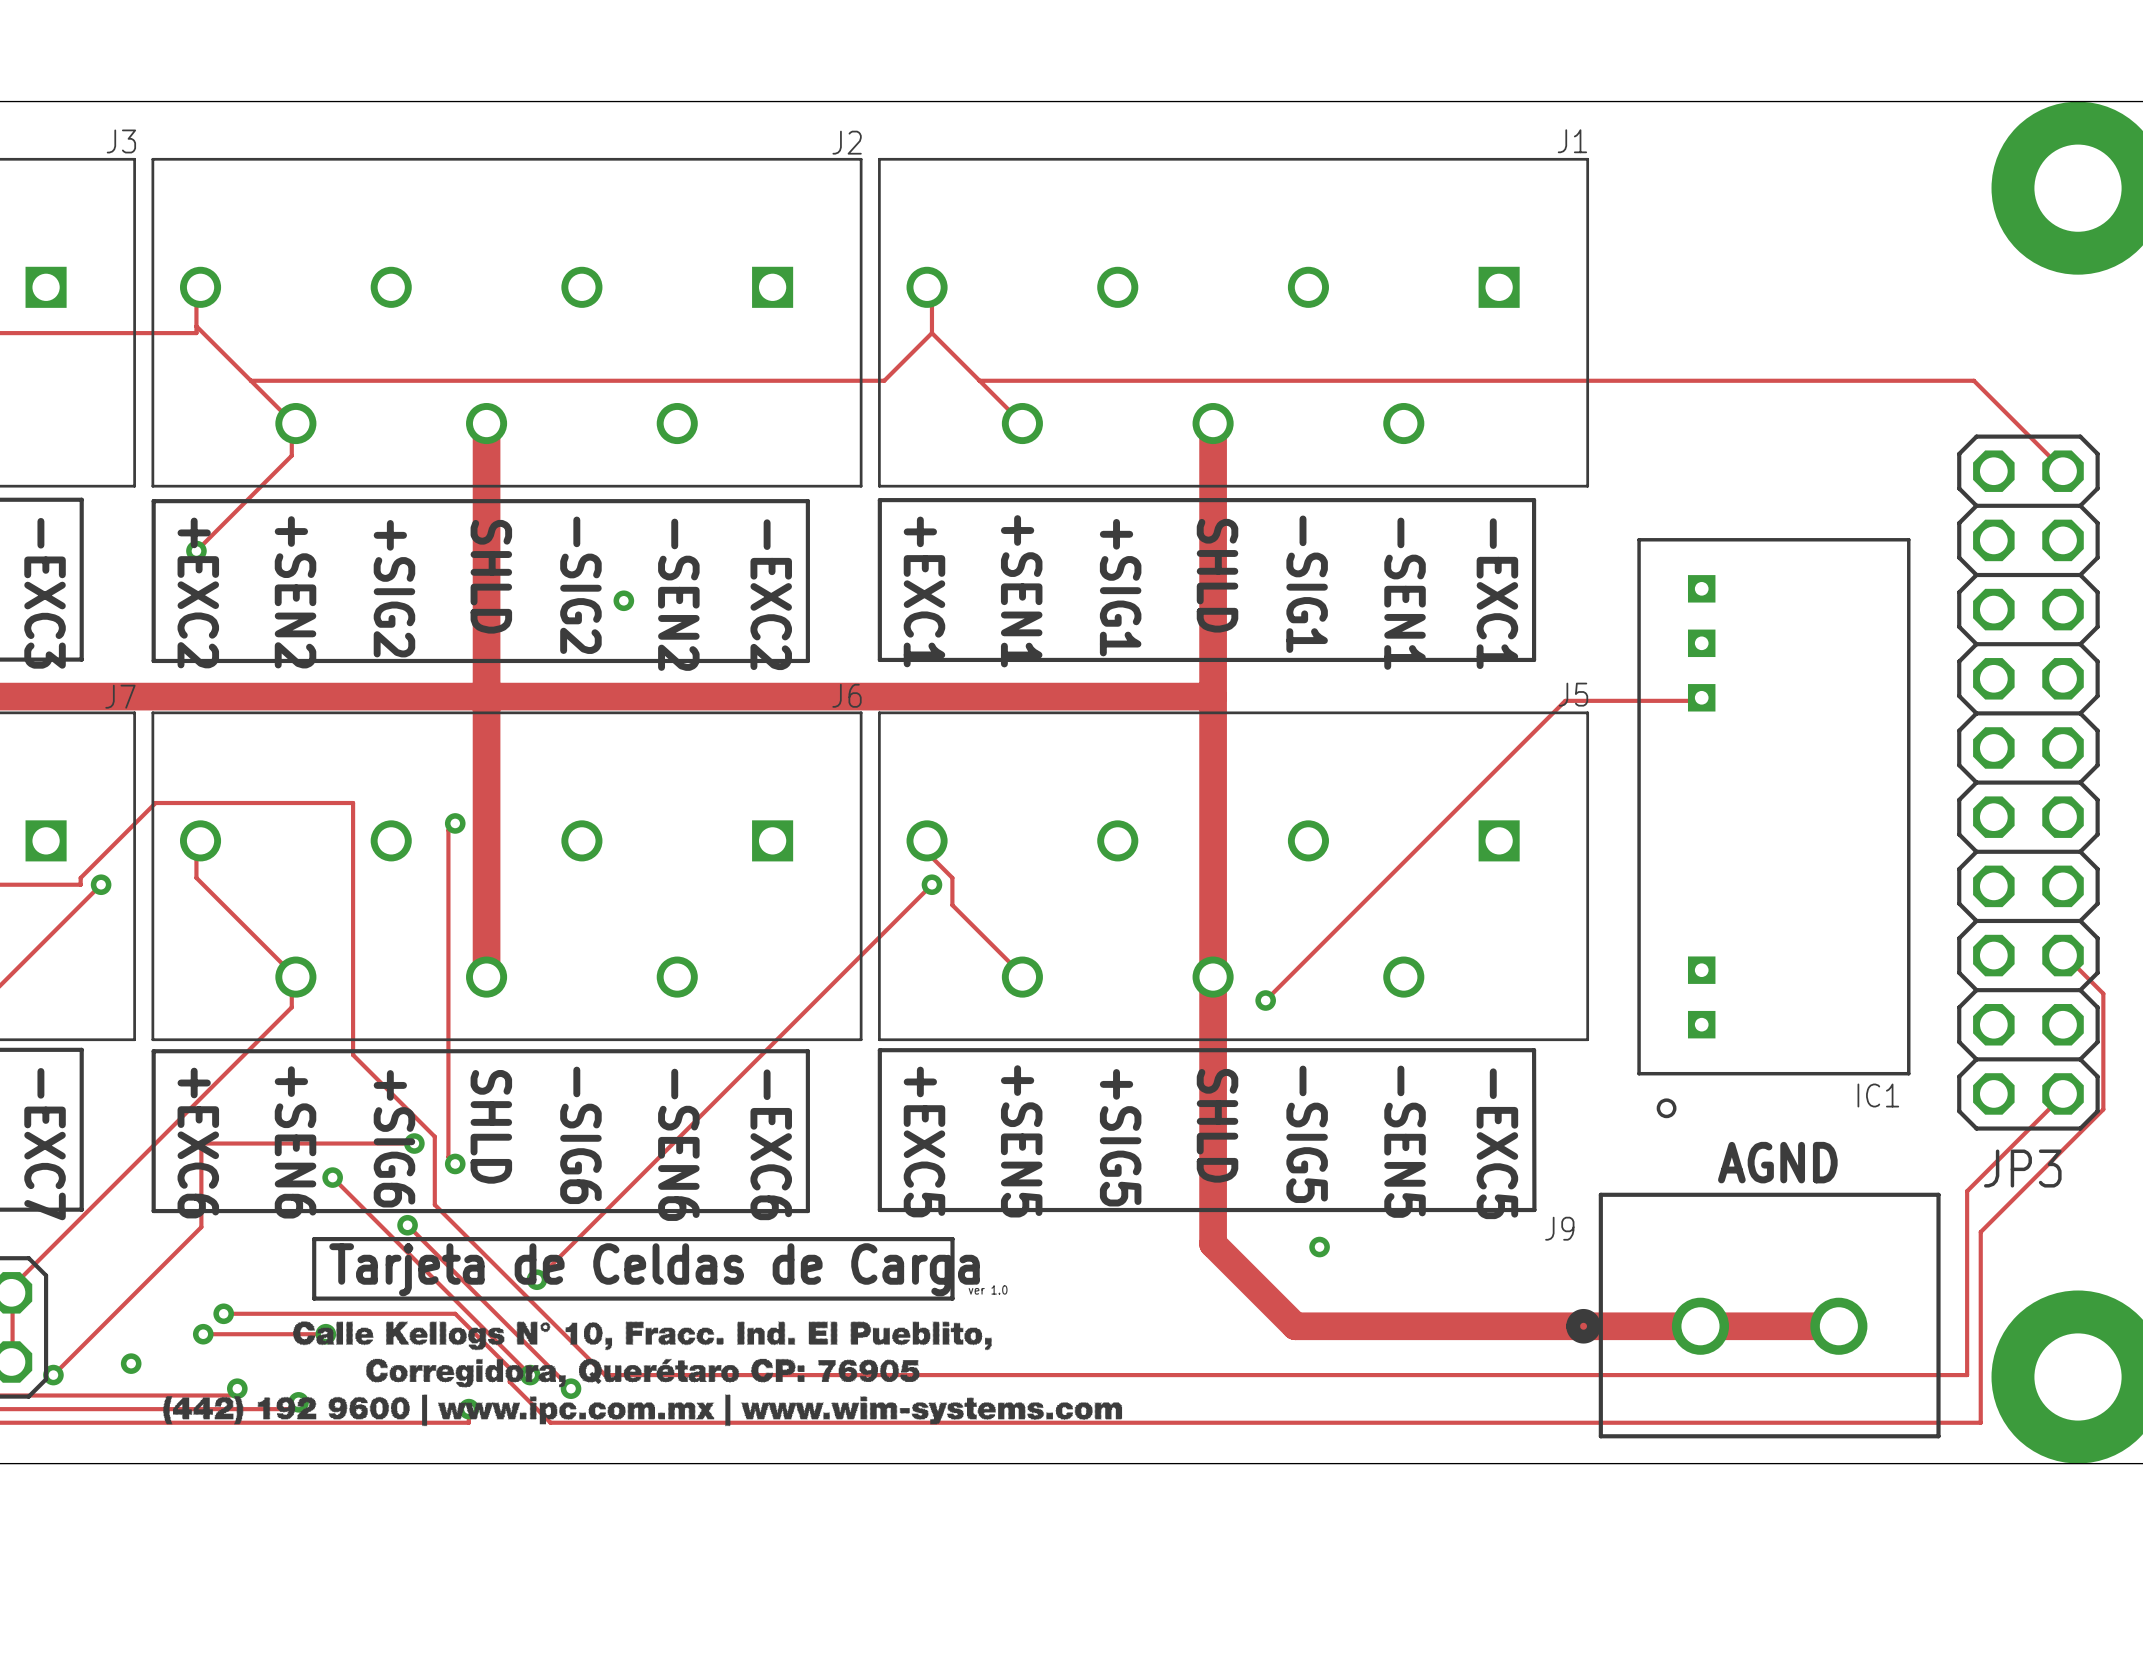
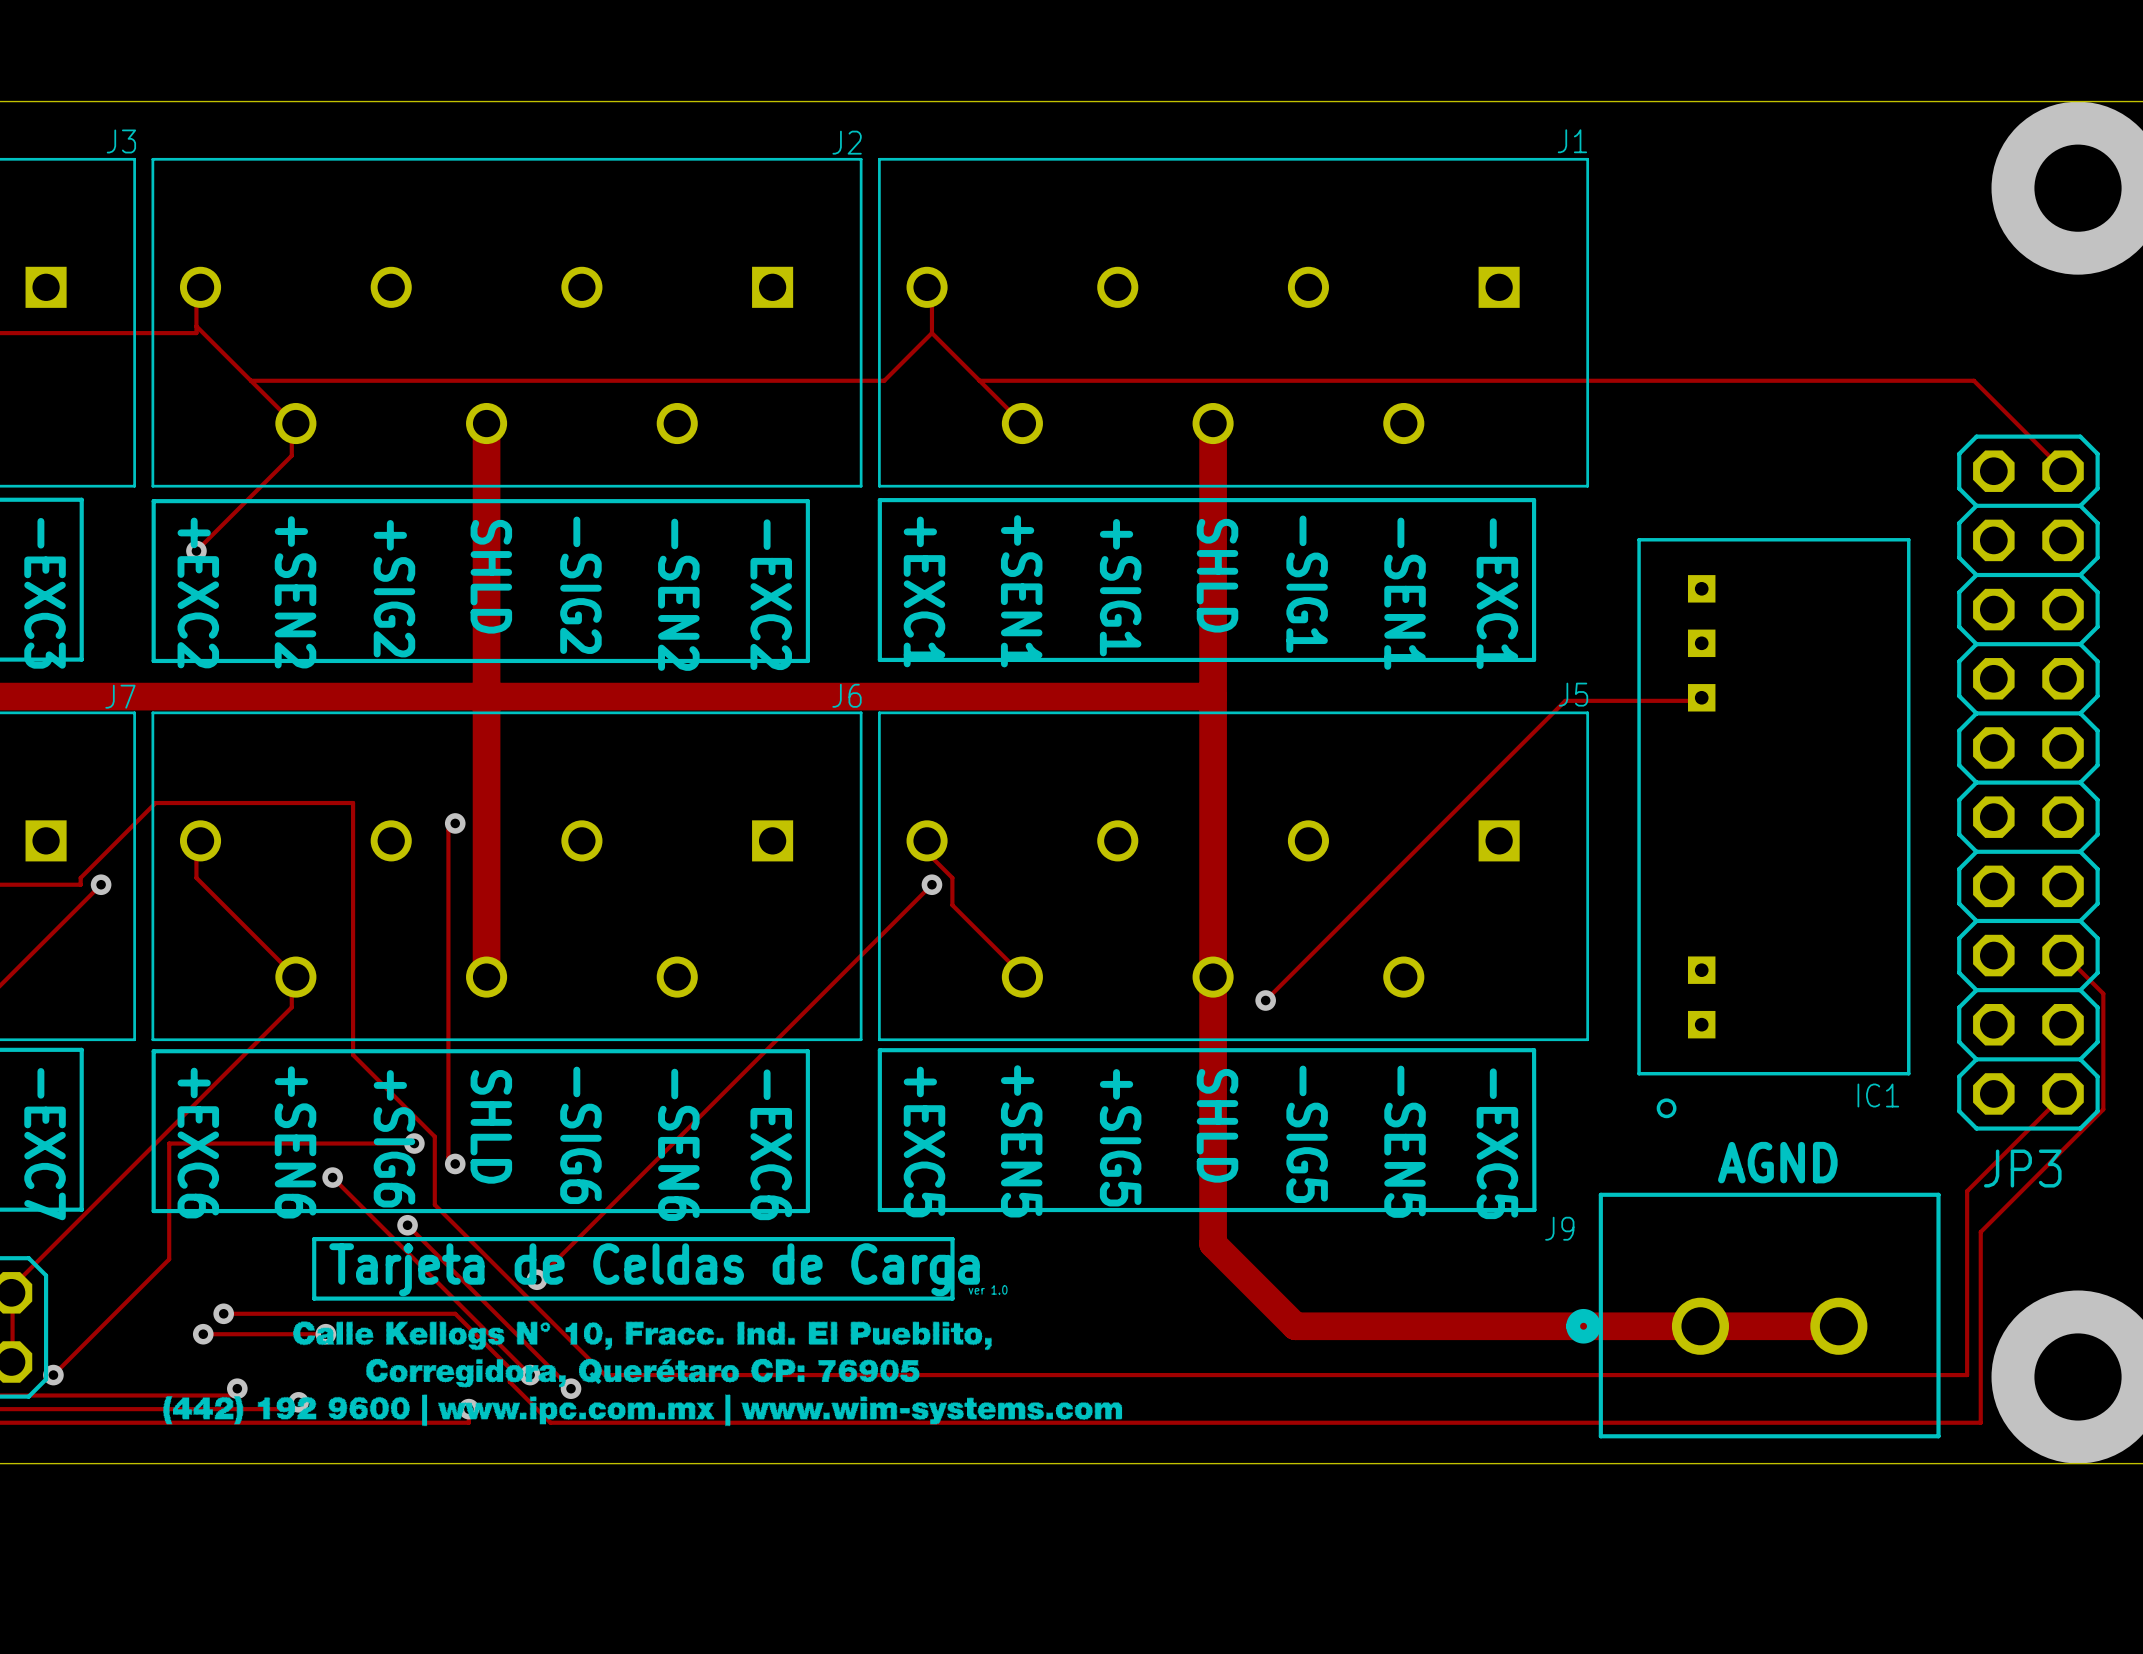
via: (623, 600) -> none
track: (201, 1143) (201, 1227) (169, 1259) -> (201, 1143) (169, 1143) (169, 1259)
via: (1319, 1247) -> none
via: (131, 1363) -> none

